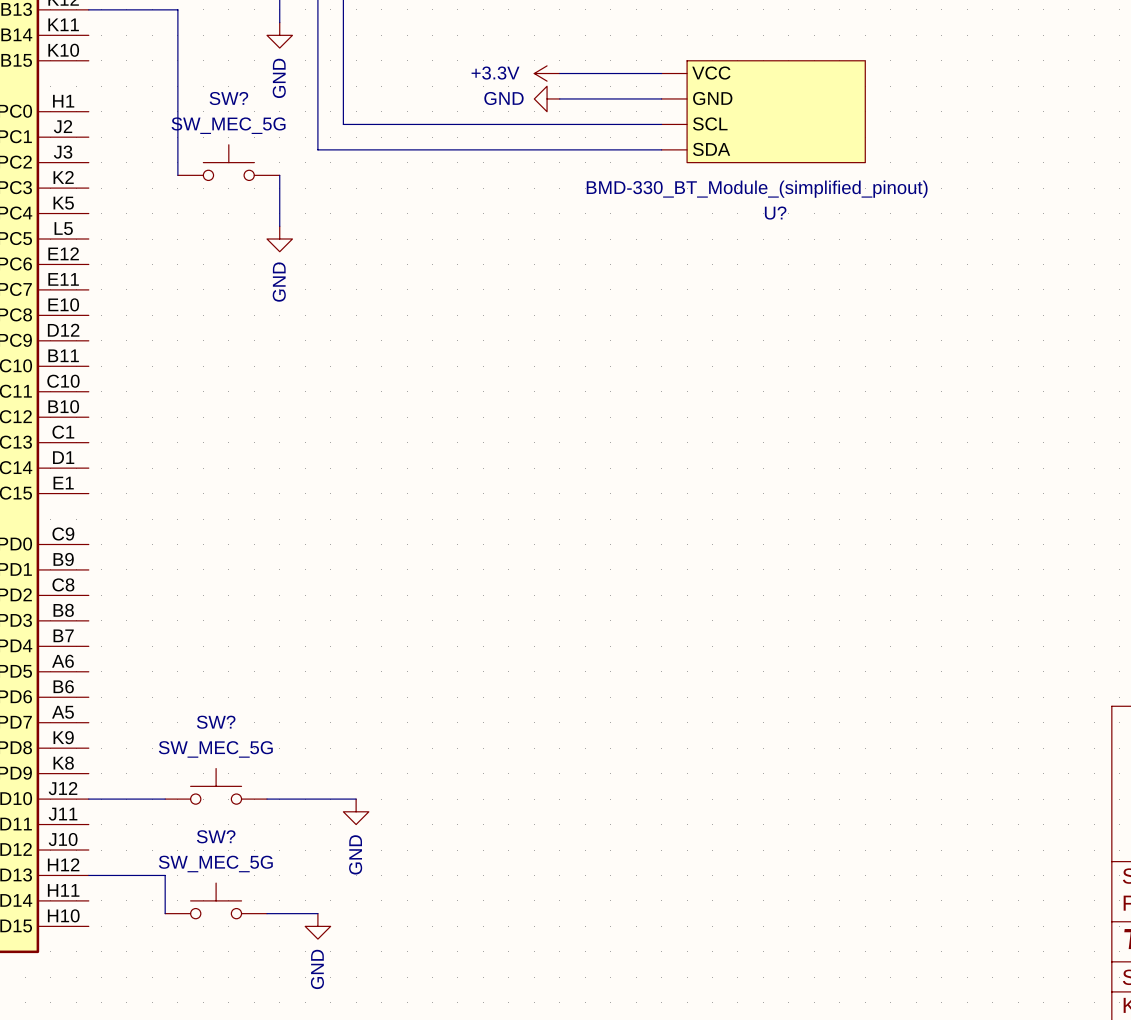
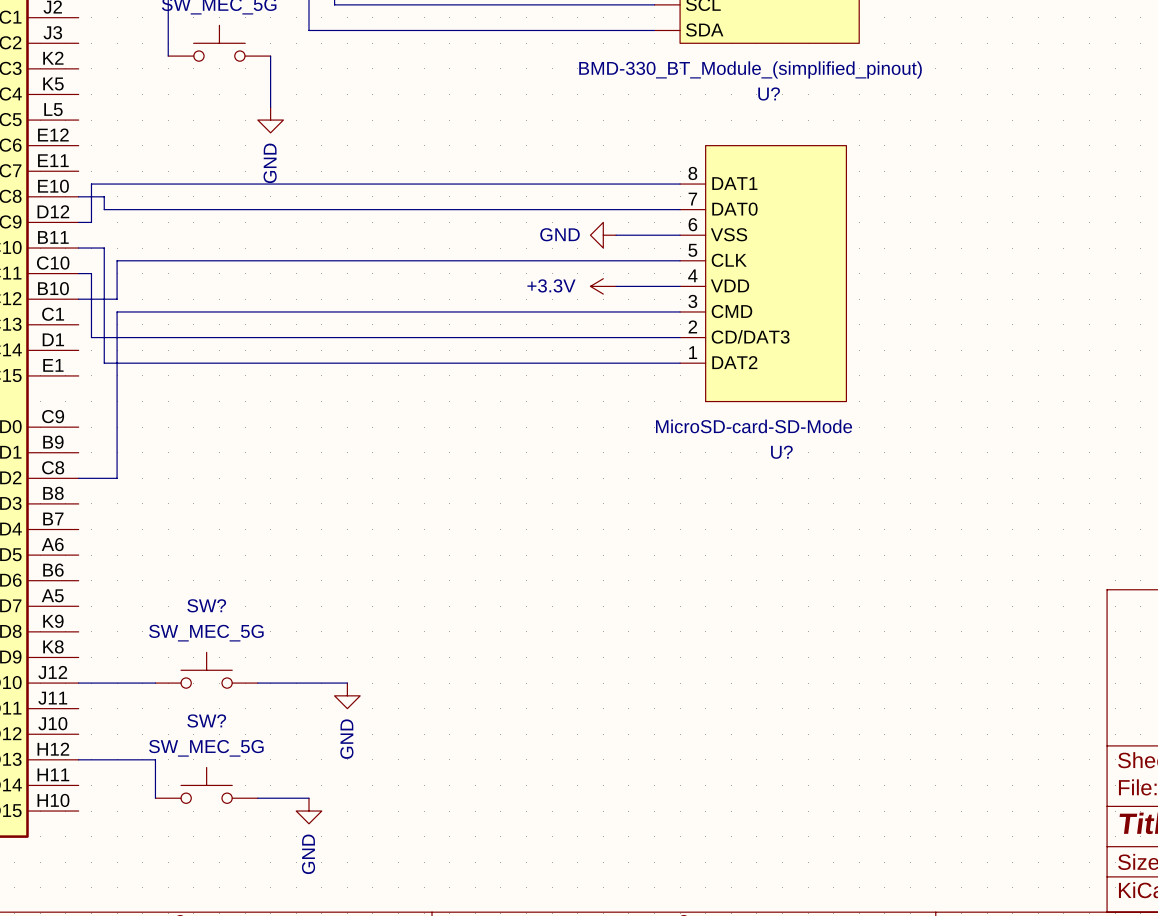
wire: none -> (680, 184) (91, 184) (91, 222) (78, 222)
wire: none -> (78, 196) (104, 196) (104, 209) (680, 209)
power symbol: none -> GND (603, 235)
wire: none -> (616, 235) (680, 235)
wire: none -> (78, 248) (104, 248) (104, 363) (680, 363)
wire: none -> (680, 260) (117, 260) (117, 299) (78, 299)
wire: none -> (78, 273) (91, 273) (91, 337) (680, 337)
U?: none -> MicroSD-card-SD-Mode (763, 273)
power symbol: none -> +3.3V (603, 286)
wire: none -> (616, 286) (680, 286)
wire: none -> (680, 311) (117, 311) (117, 478) (78, 478)

